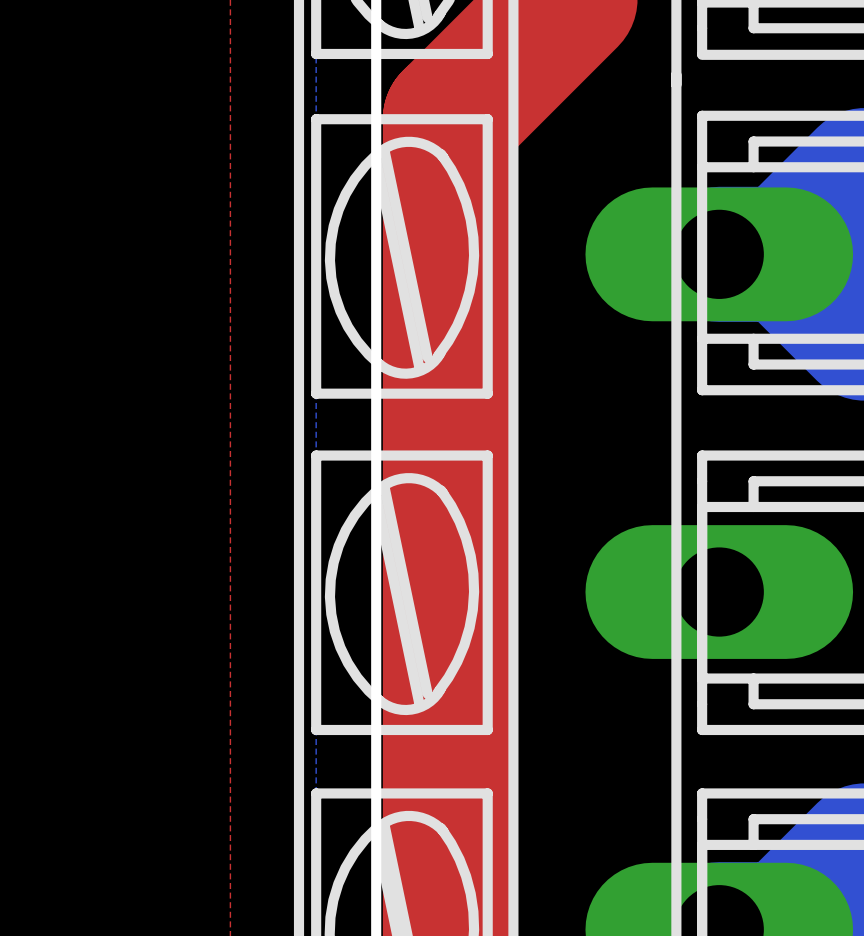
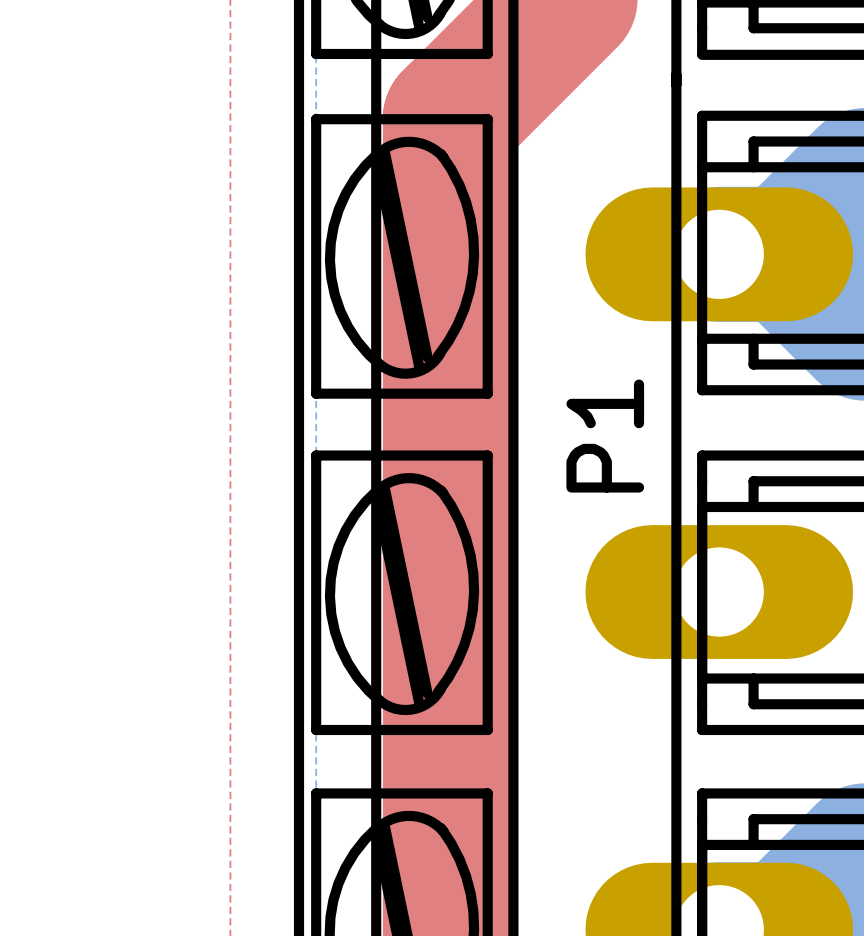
P1 name: none -> P1 (605, 436)

